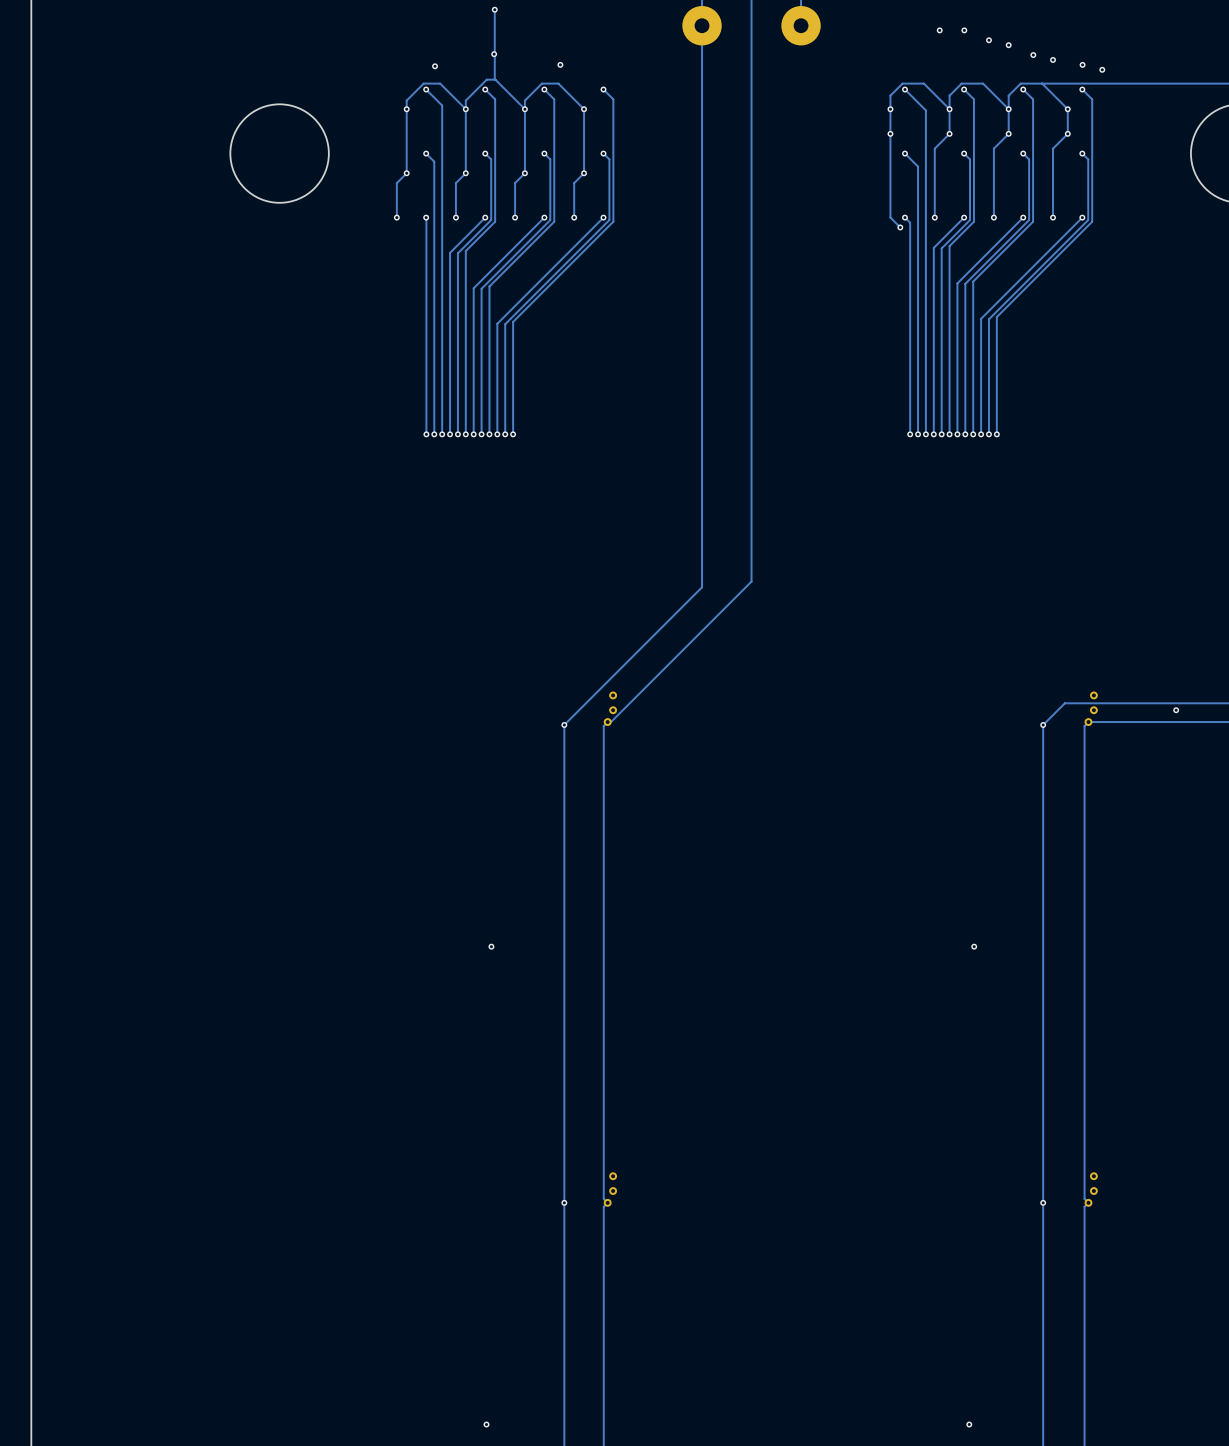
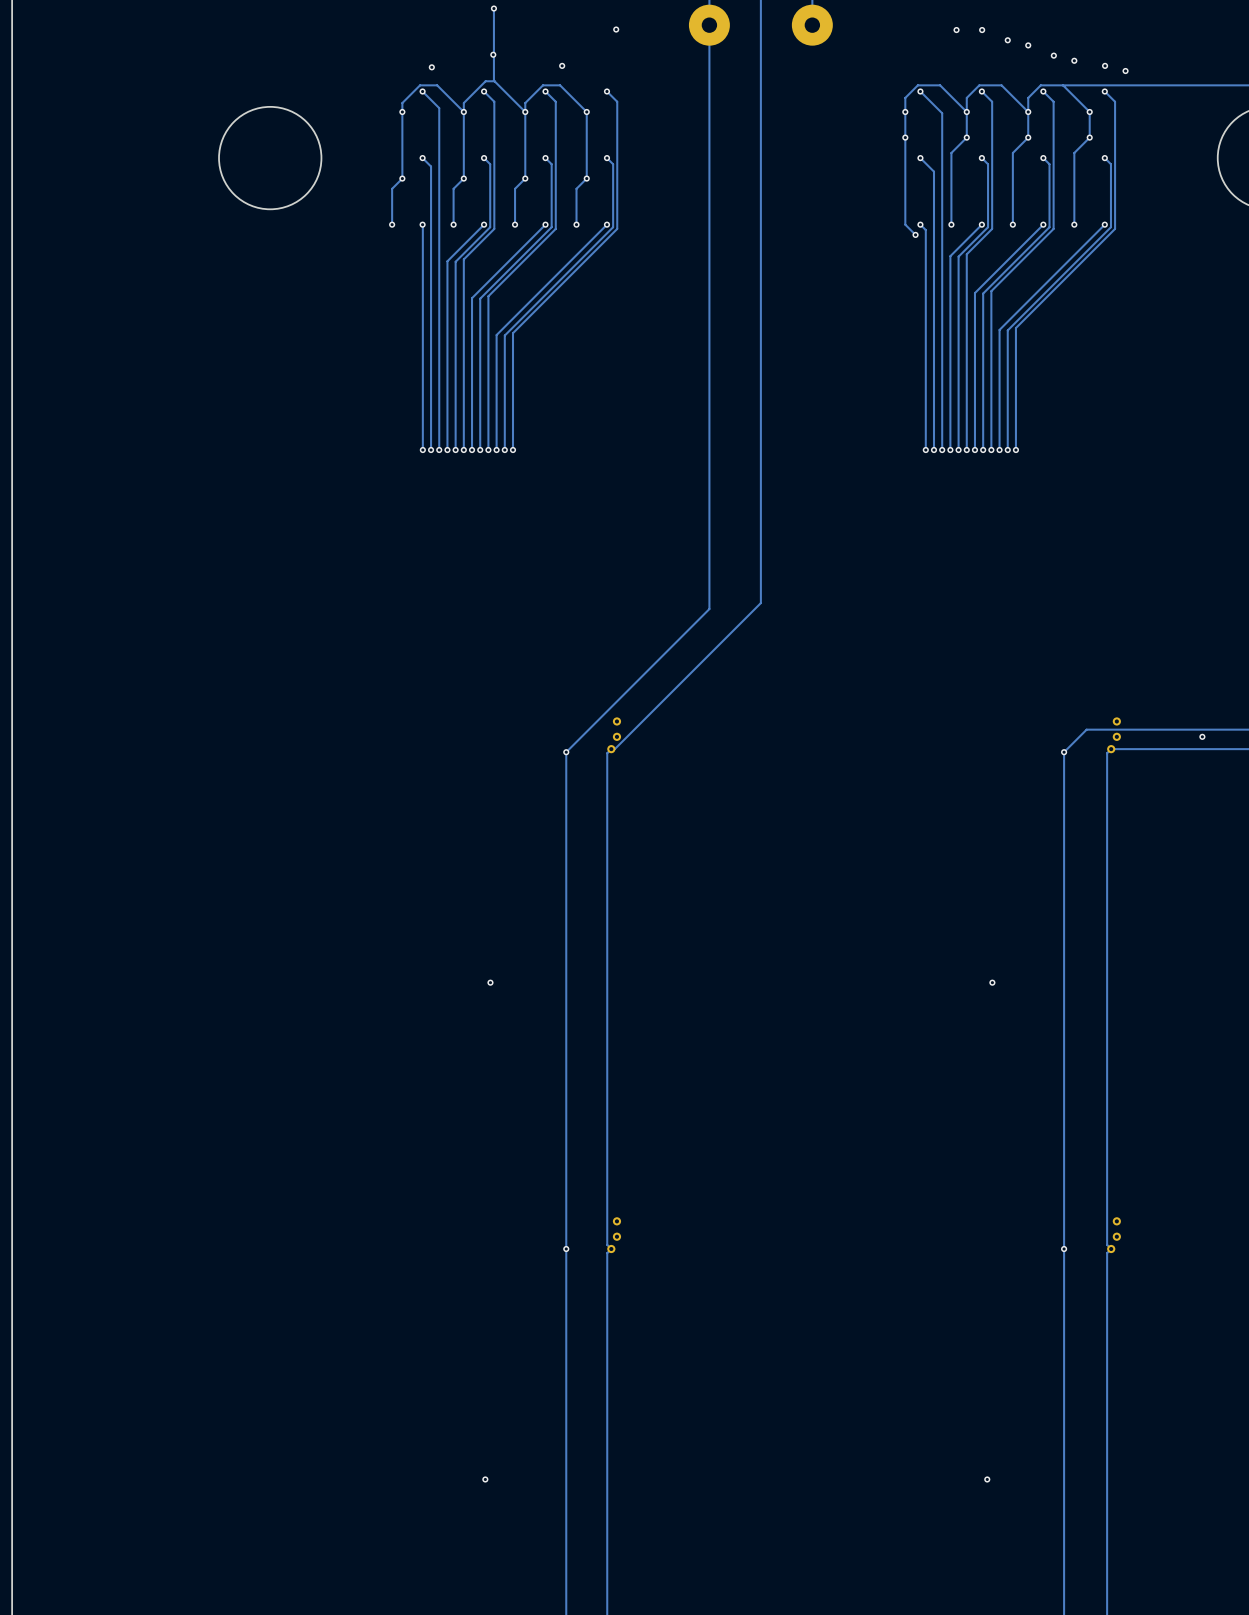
via: none -> (616, 29)

